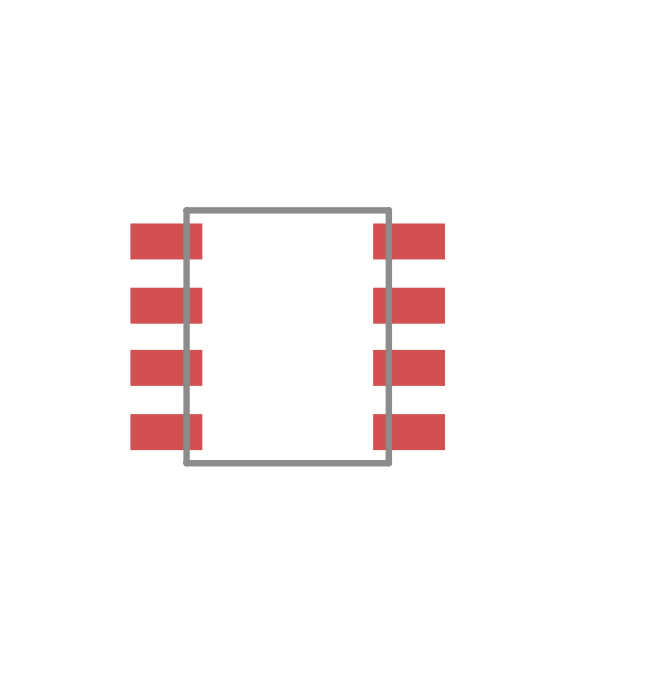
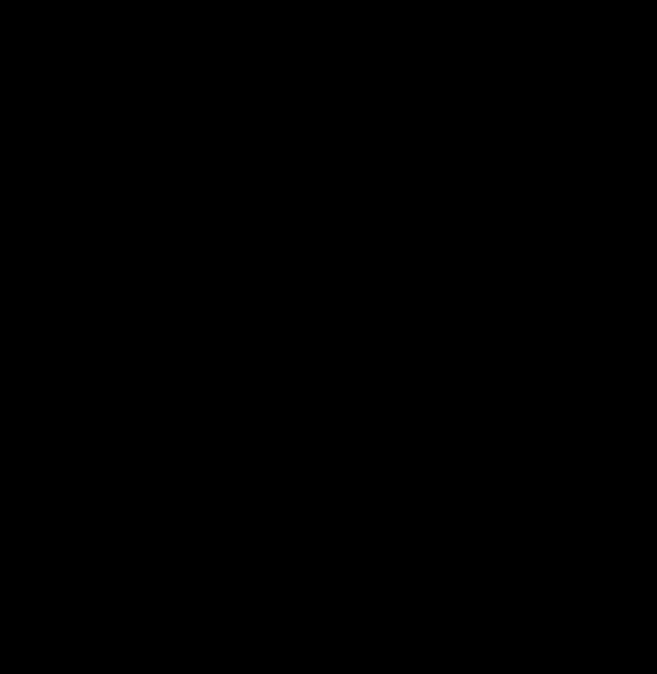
part: (287, 336) -> none

